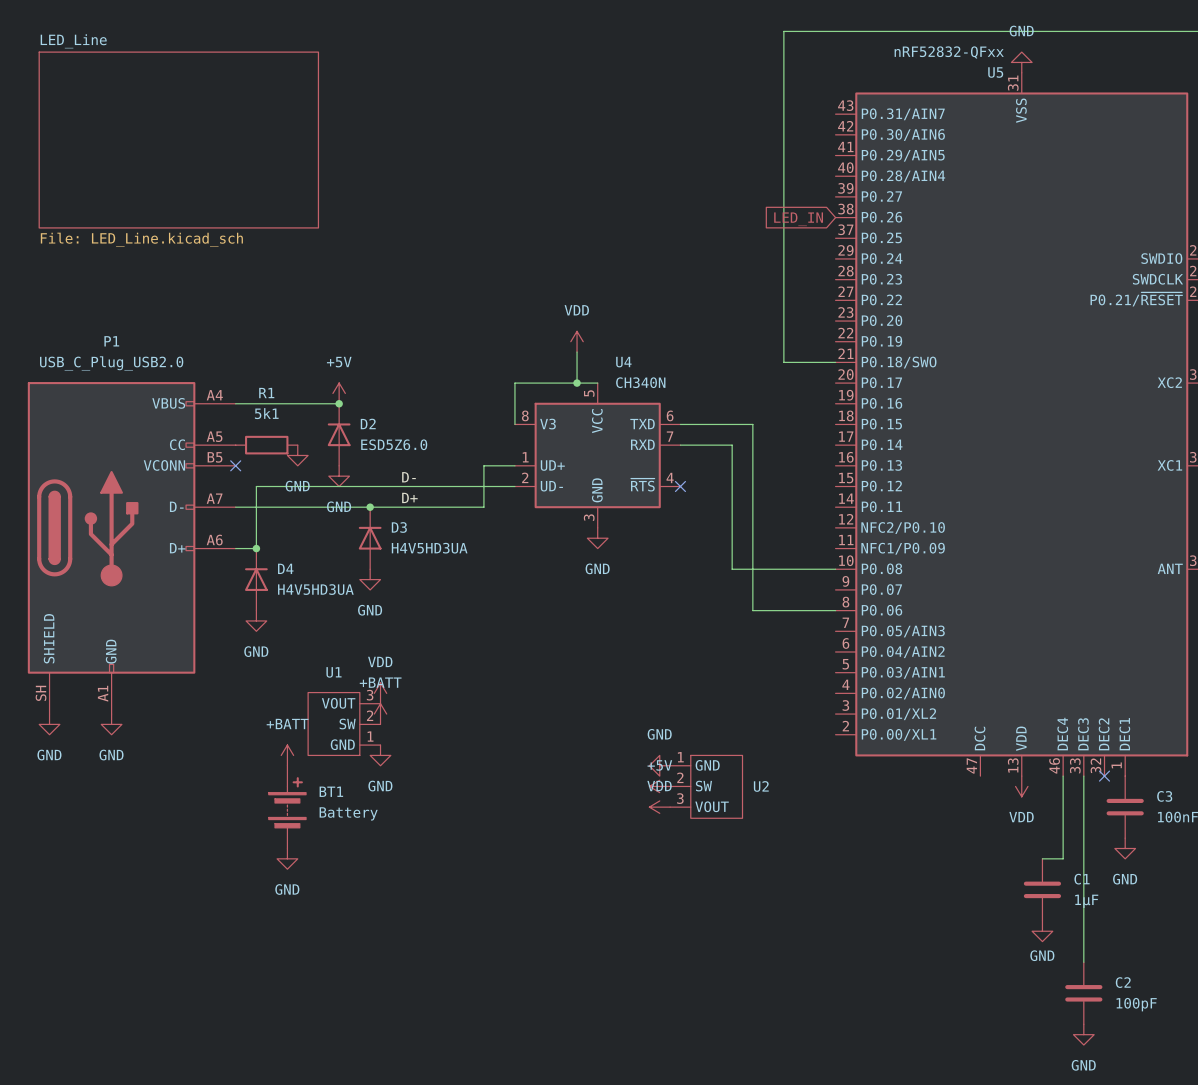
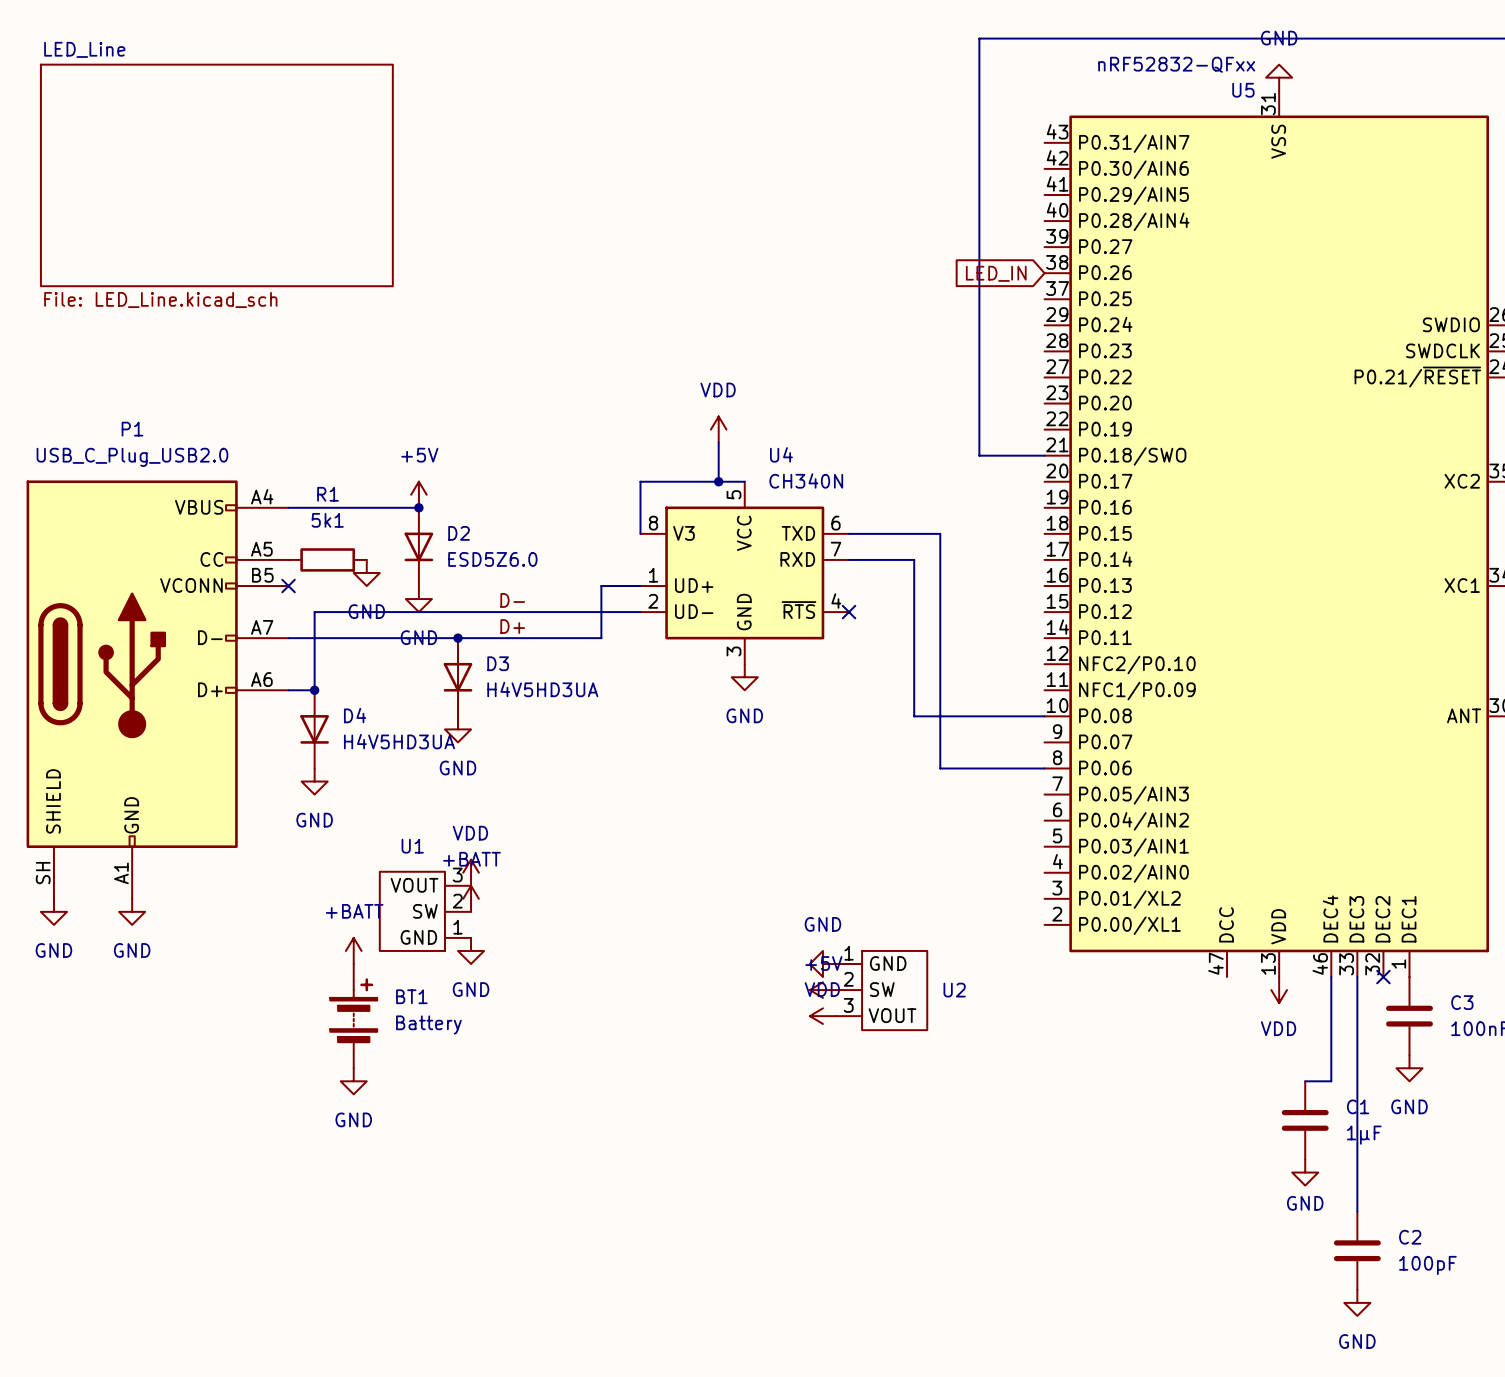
D2 rotation: 0° (339, 434) -> 180° (418, 546)
D3 rotation: 0° (370, 538) -> 180° (458, 677)
D4 rotation: 0° (256, 579) -> 180° (314, 729)

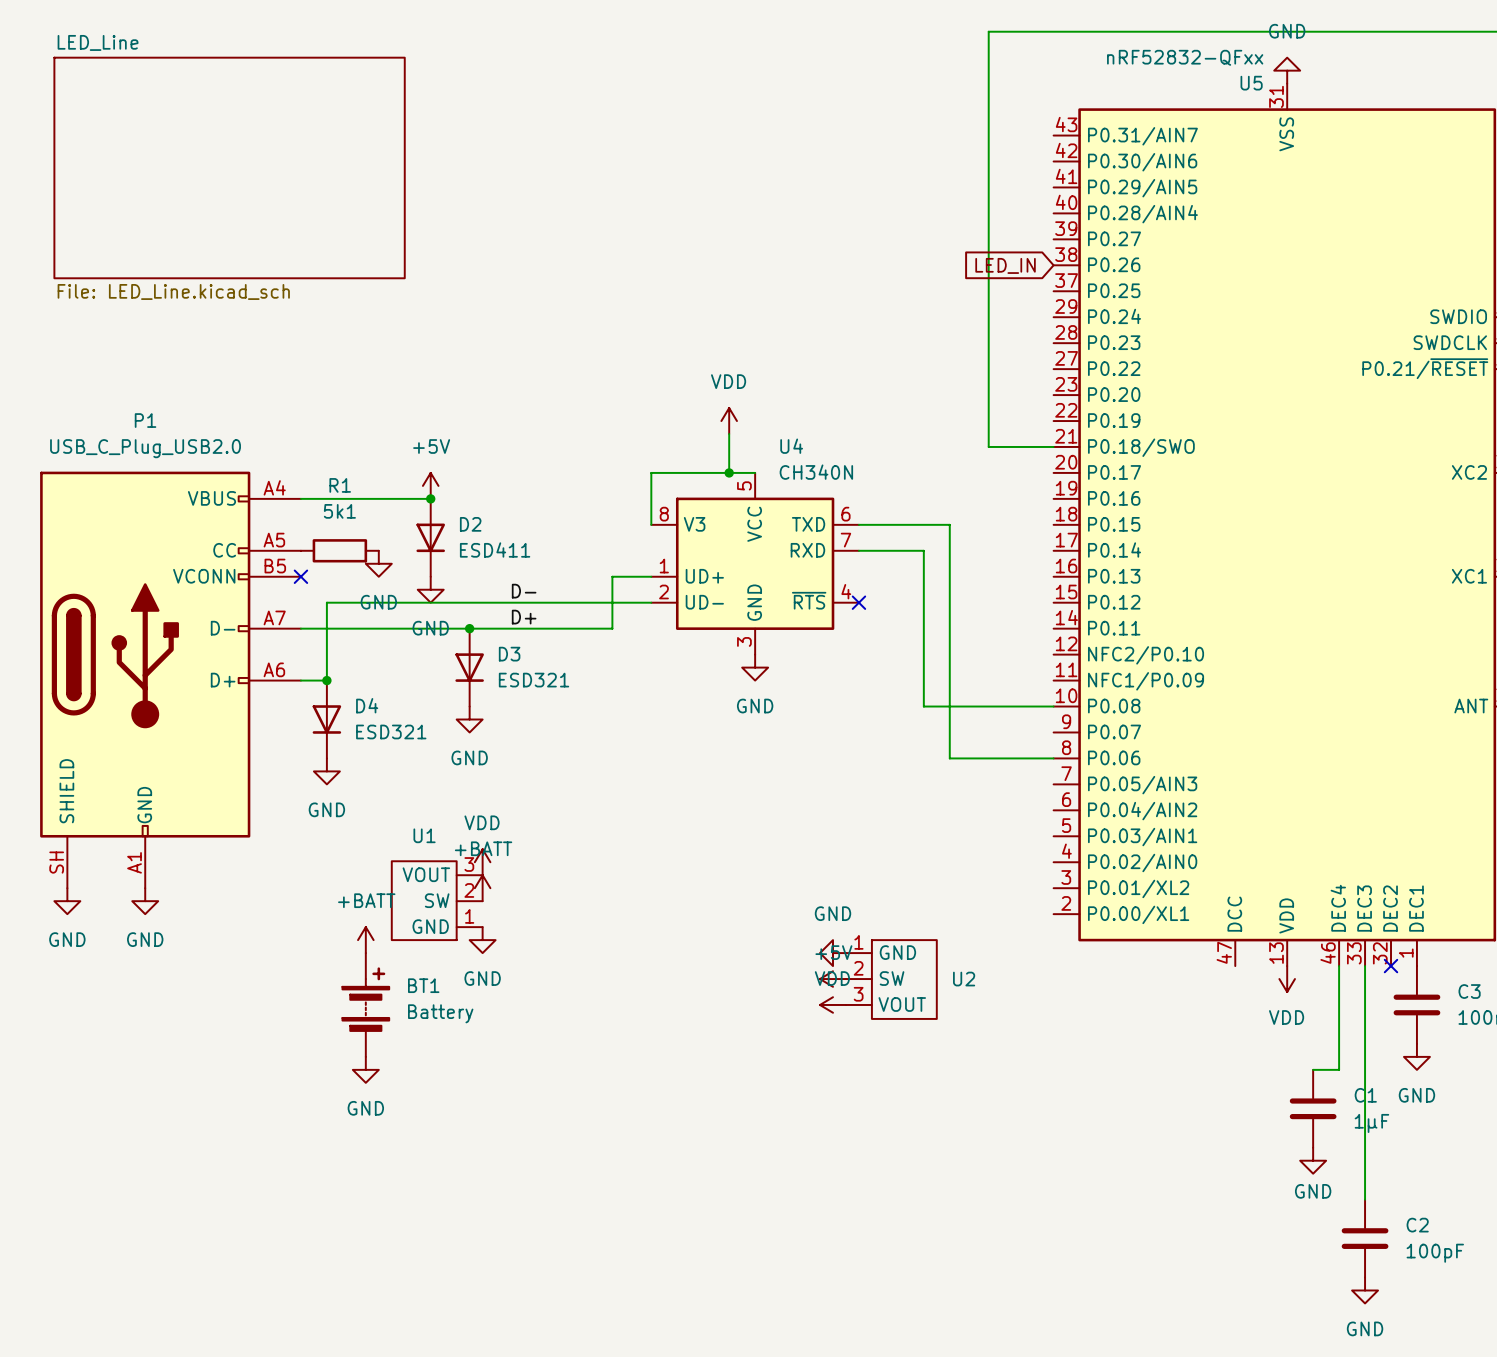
D2 value: ESD5Z6.0 (492, 559) -> ESD411 (495, 550)
D3 value: H4V5HD3UA (542, 689) -> ESD321 (534, 680)
D4 value: H4V5HD3UA (399, 741) -> ESD321 (391, 731)

